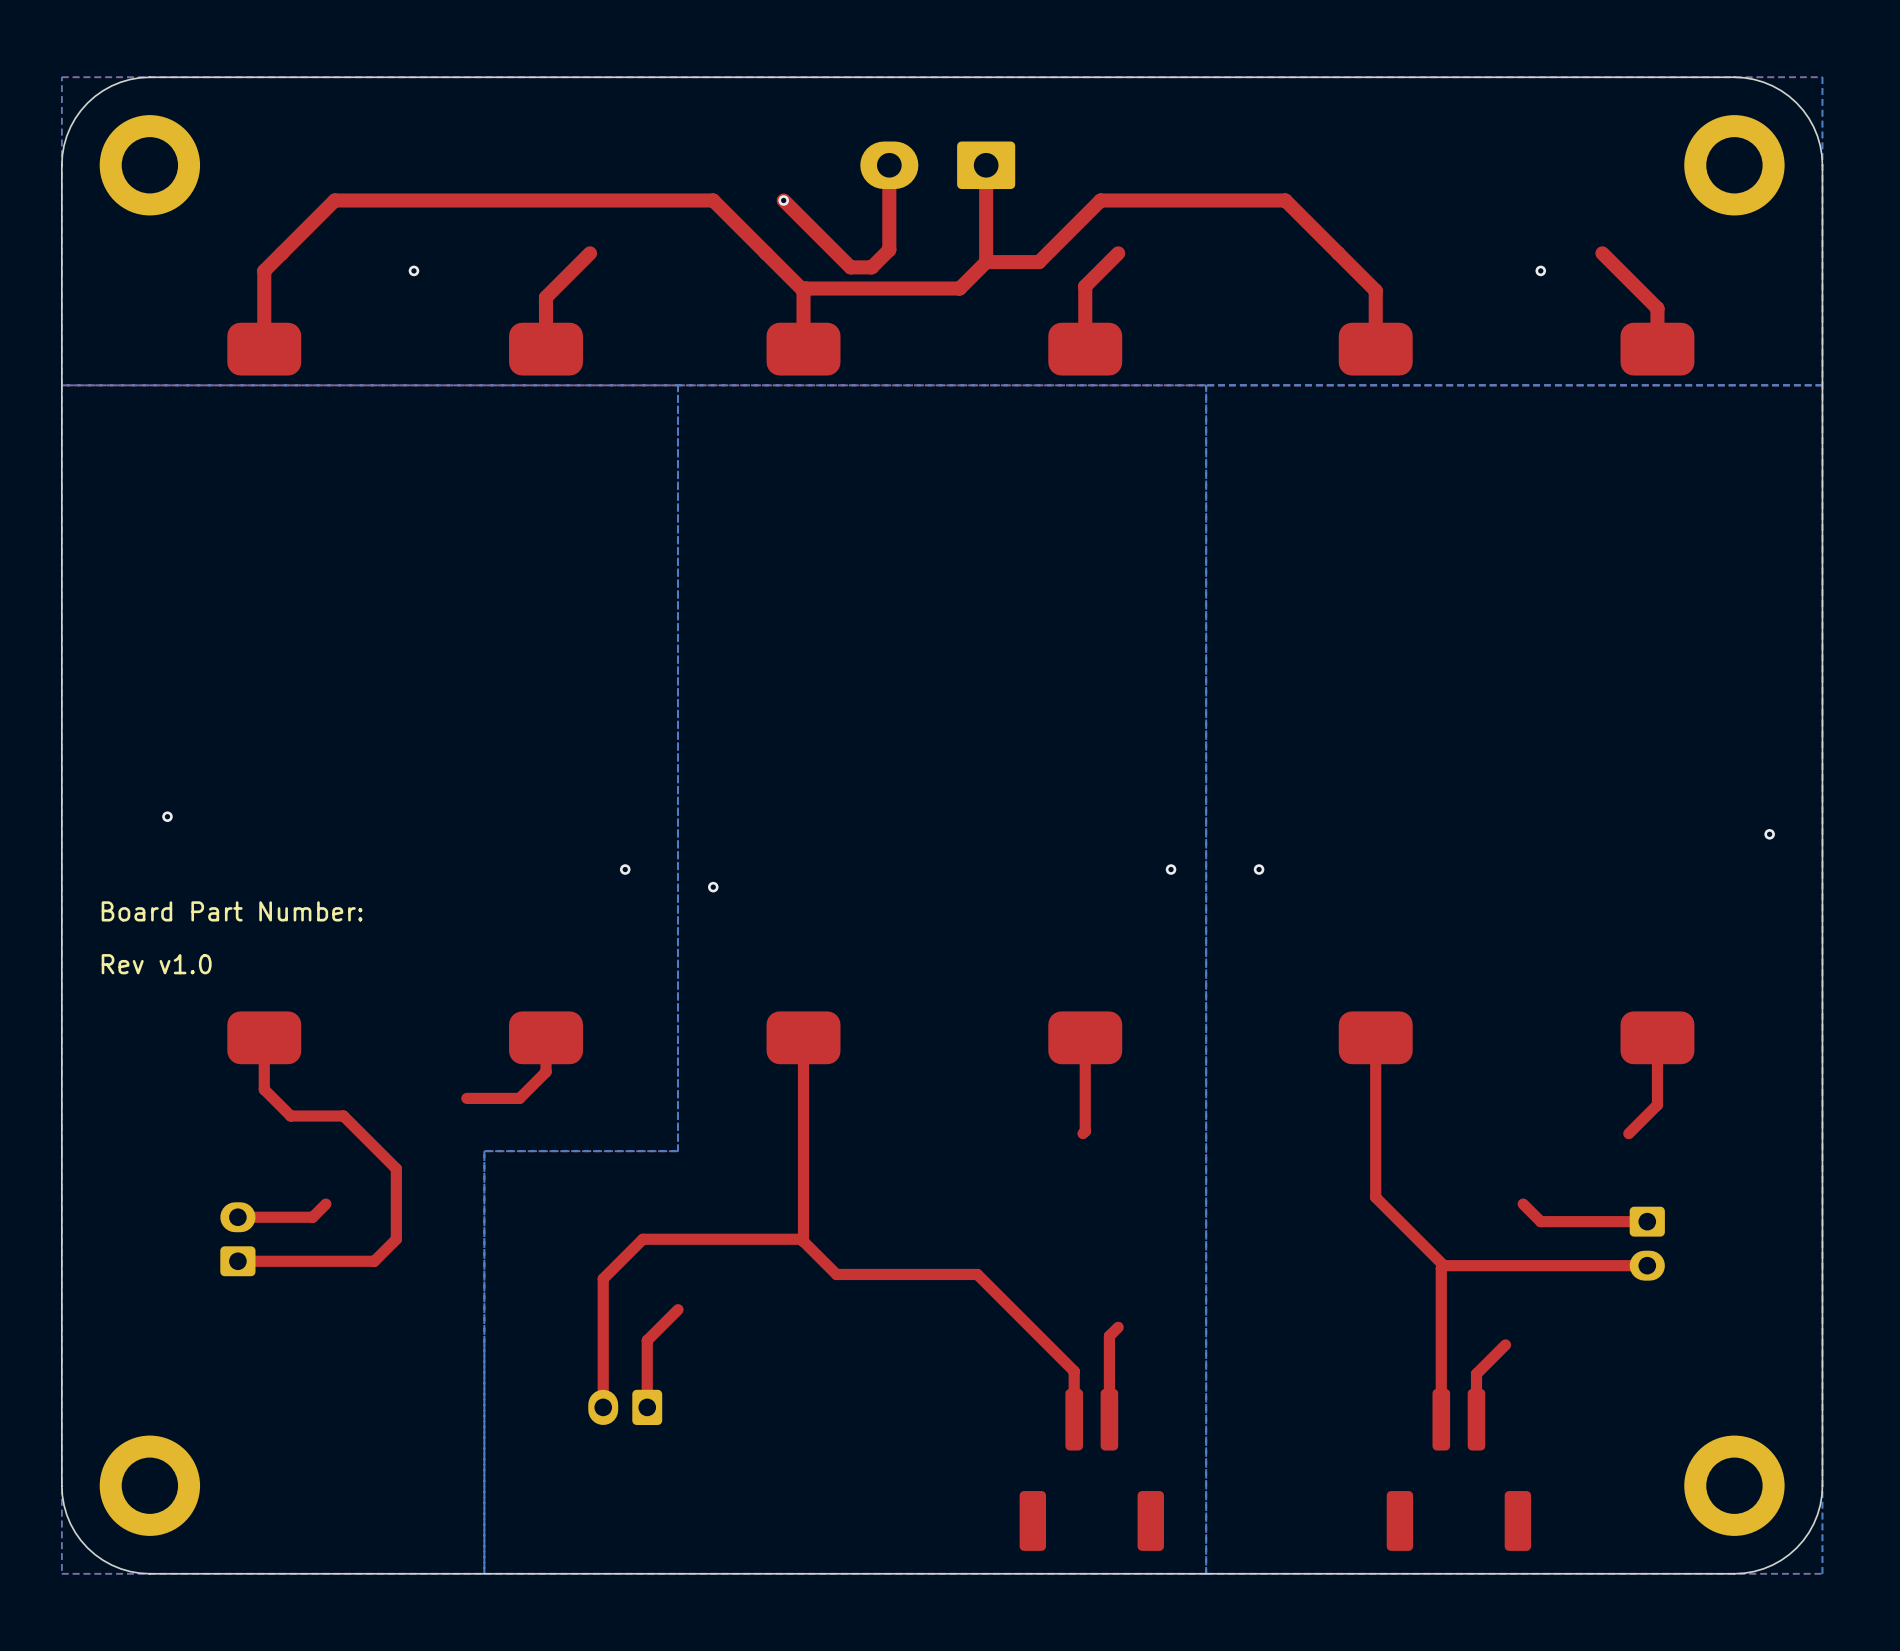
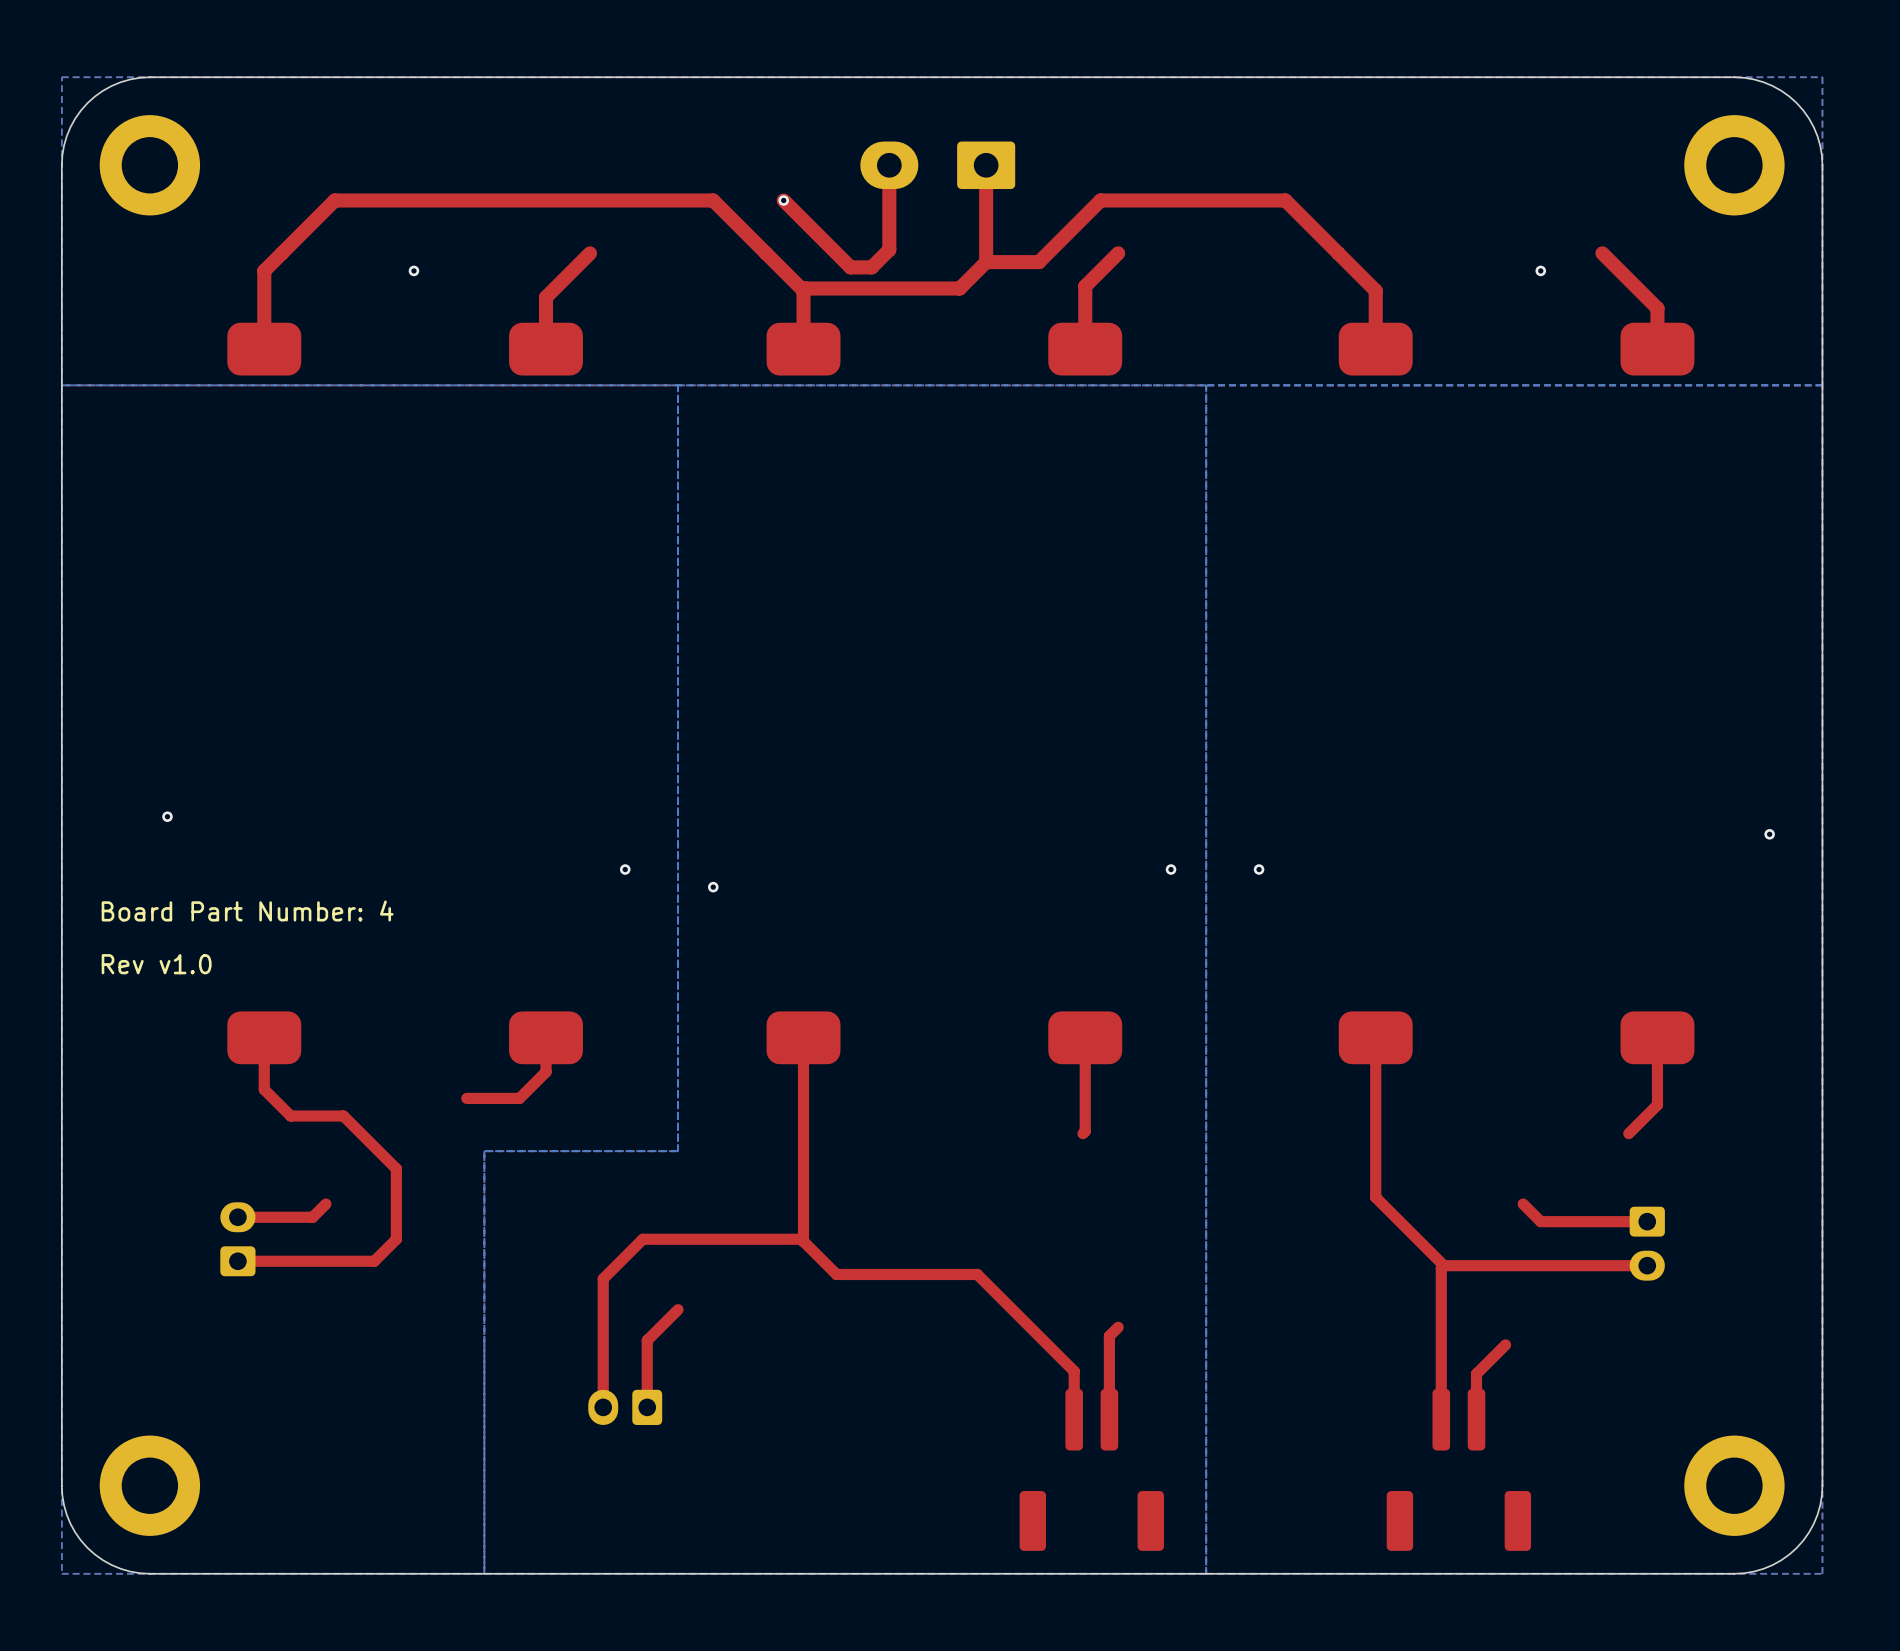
text: Board Part Number: (232, 911) -> Board Part Number: 4 (247, 910)

